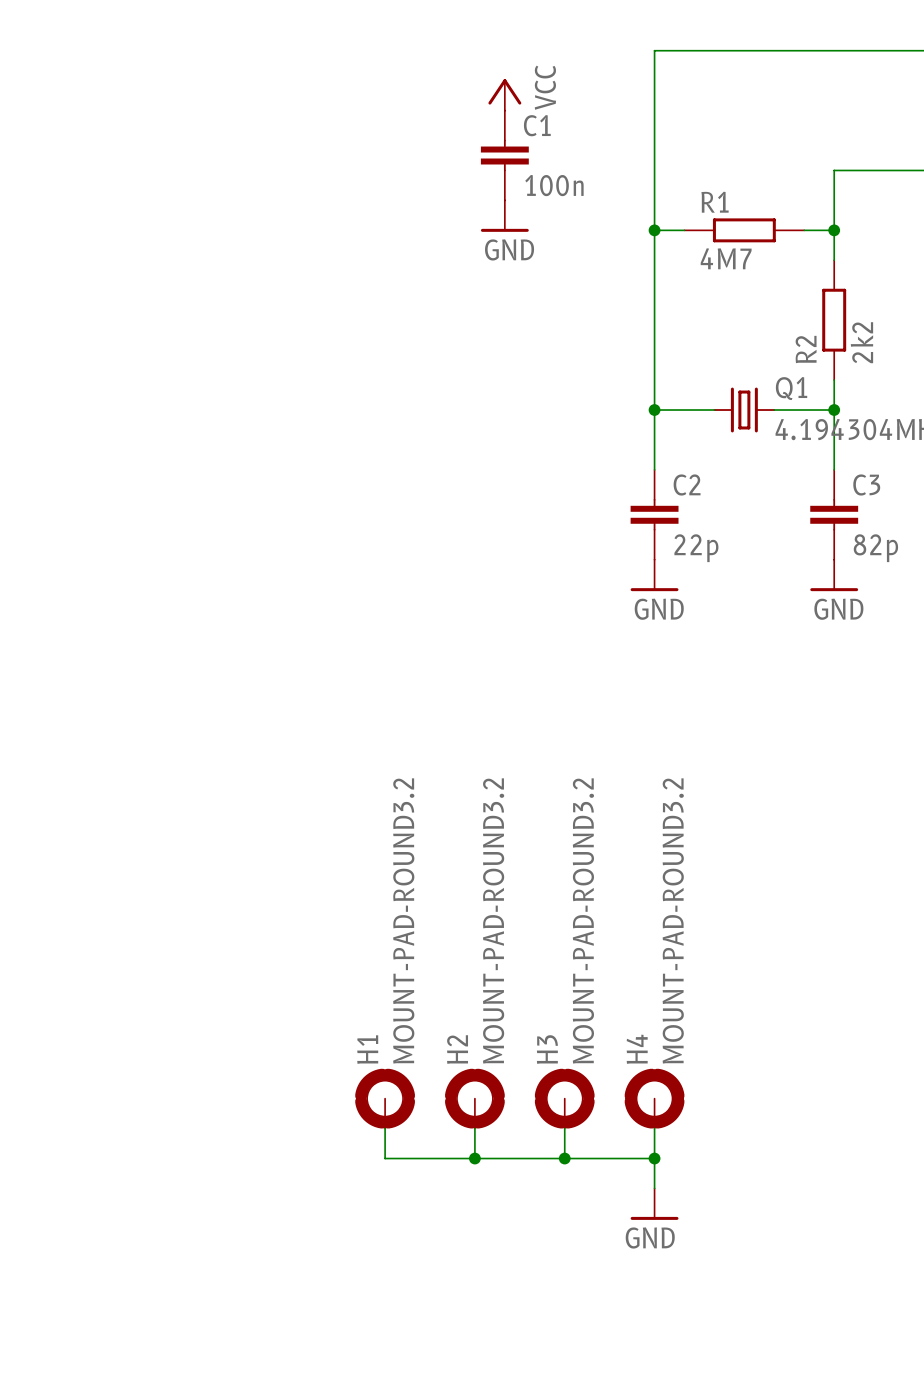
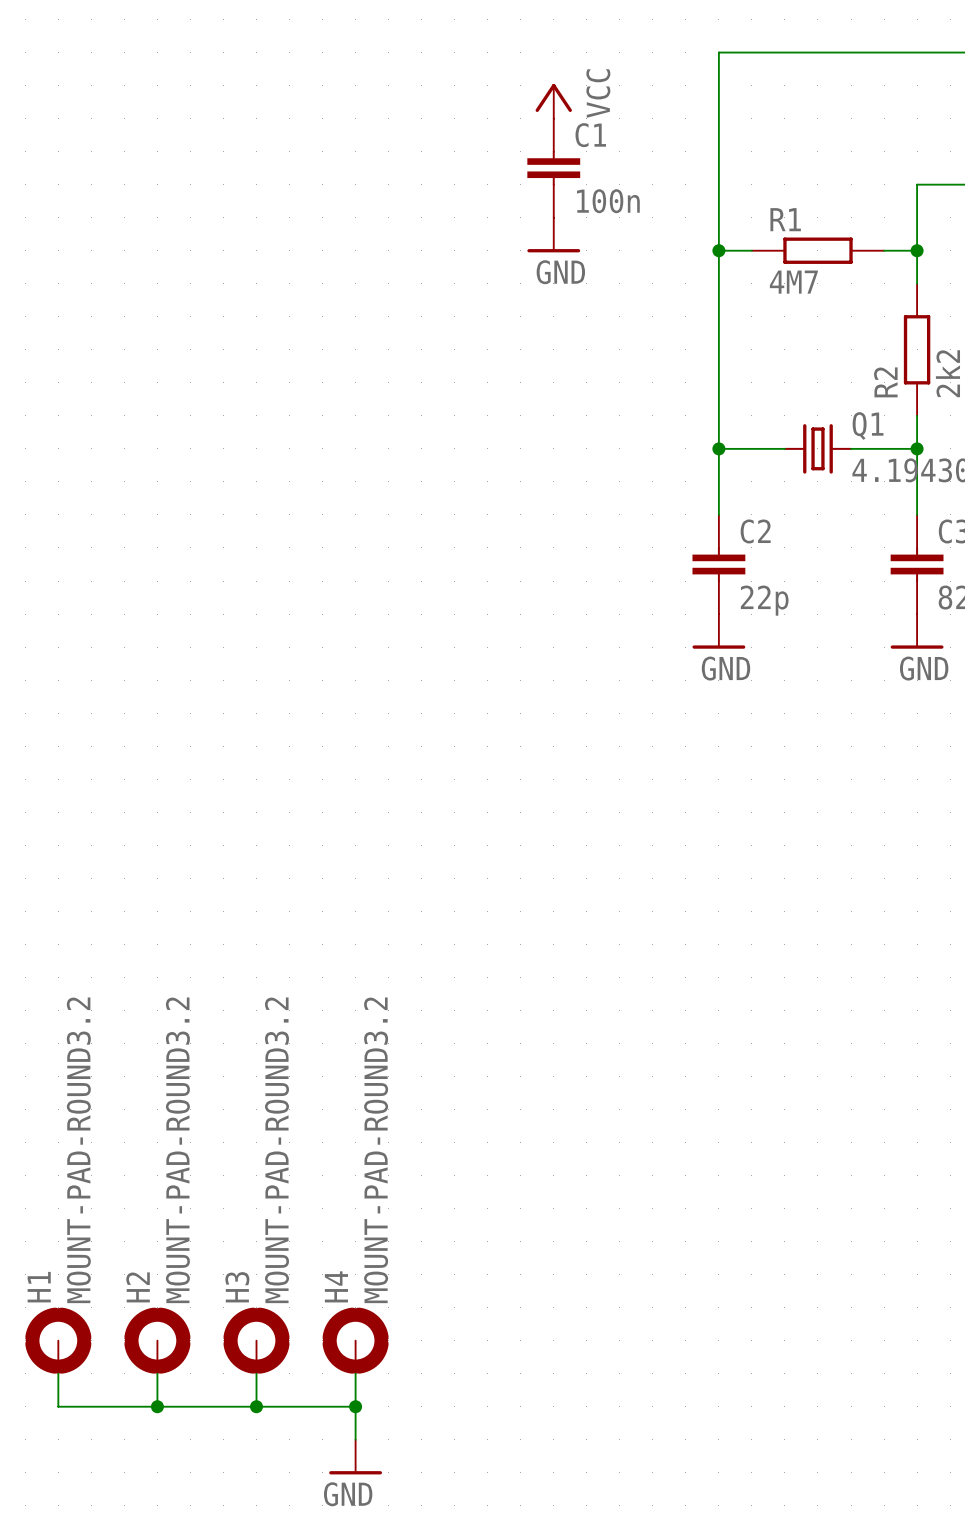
H1 position: (385, 1098) -> (58, 1340)
H2 position: (474, 1098) -> (157, 1340)
H3 position: (564, 1098) -> (256, 1340)
H4 position: (654, 1098) -> (355, 1340)
wire: (385, 1128) (385, 1158) (654, 1158) -> none
wire: (474, 1128) (474, 1158) -> (256, 1373) (256, 1406)
wire: (564, 1128) (564, 1158) -> none
wire: (654, 1128) (654, 1188) -> none
junction: (474, 1158) -> none
junction: (564, 1158) -> none
junction: (654, 1158) -> none
power symbol: GND (654, 1204) -> none
wire: none -> (58, 1373) (58, 1406) (355, 1406)
wire: none -> (157, 1373) (157, 1406)
wire: none -> (355, 1373) (355, 1439)
junction: none -> (157, 1406)
junction: none -> (256, 1406)
junction: none -> (355, 1406)
power symbol: none -> GND (355, 1457)

